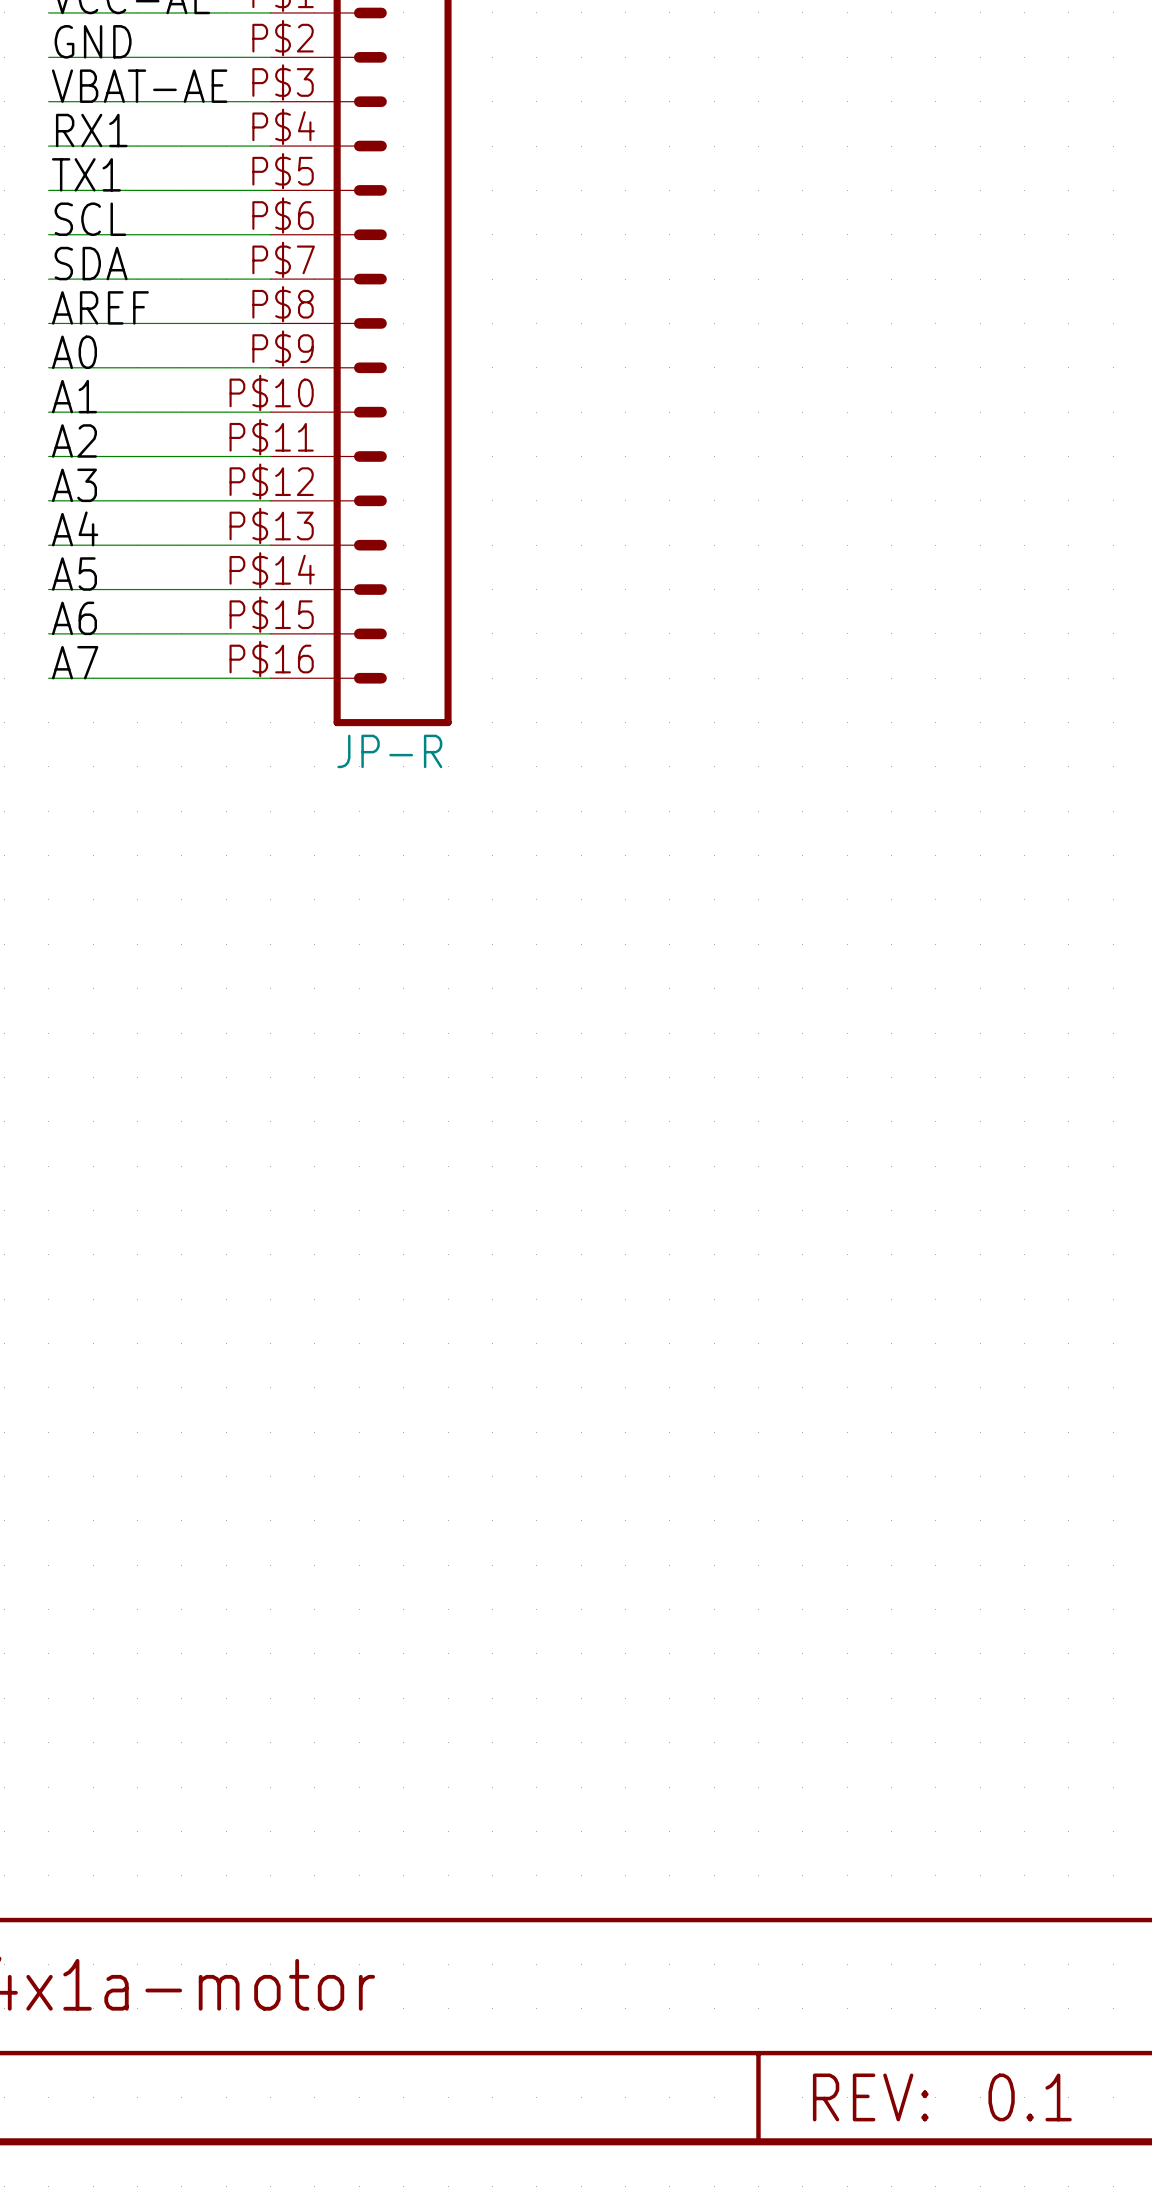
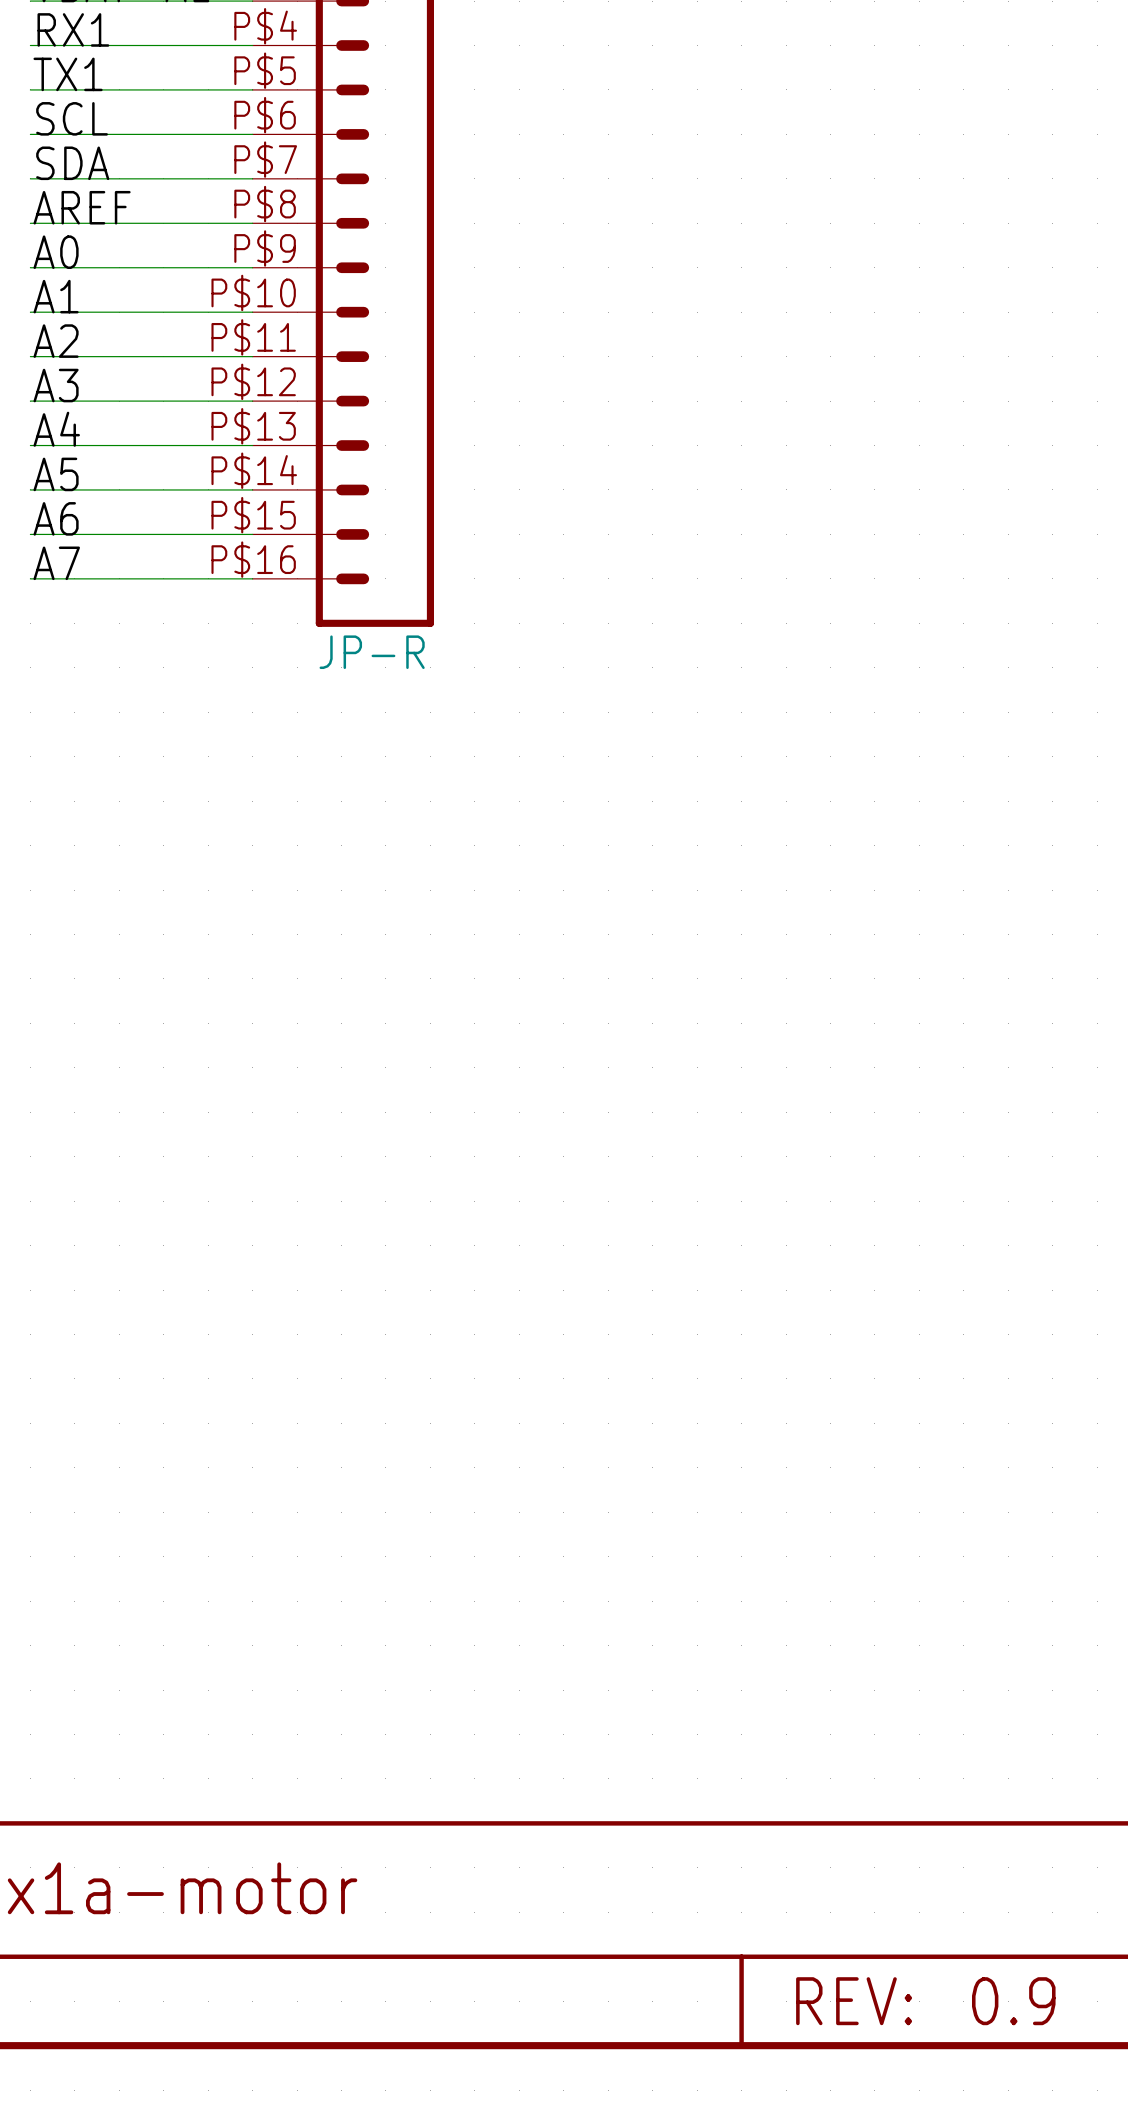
text: 0.1 (1030, 2097) -> 0.9 (1013, 2001)

